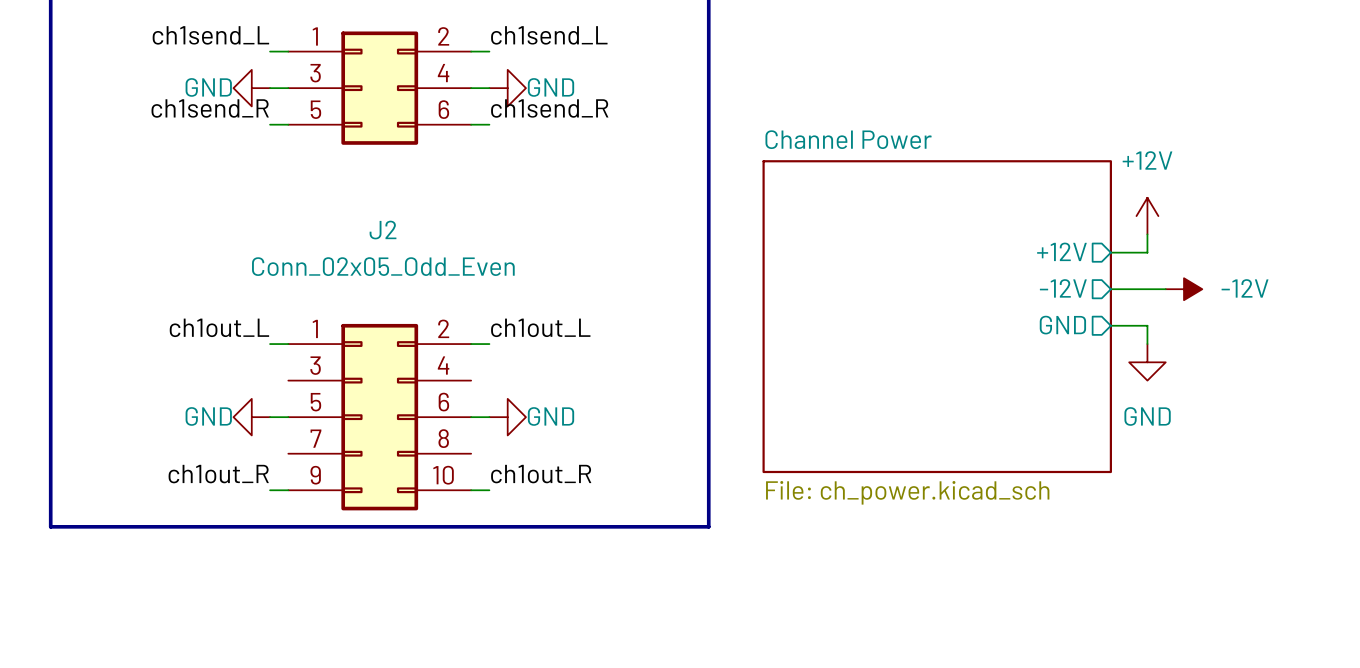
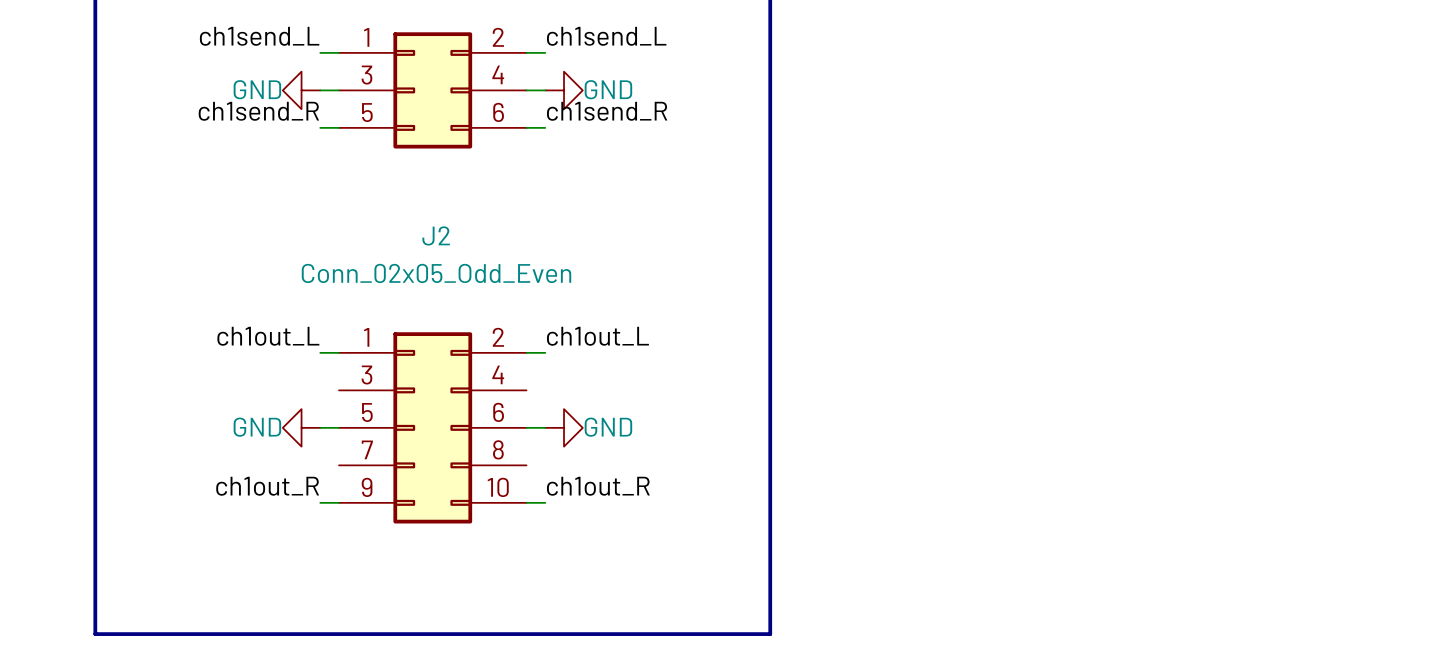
power symbol: +12V (1147, 216) -> none
wire: (1147, 234) (1147, 252) (1110, 252) -> none
sheet pin: +12V (1061, 251) -> none
sheet pin: -12V (1063, 288) -> none
wire: (1110, 289) (1165, 289) -> none
power symbol: -12V (1184, 289) -> none
sheet Channel Power: File: ch_power.kicad_sch (937, 316) -> none
sheet pin: GND (1062, 325) -> none
wire: (1110, 325) (1147, 325) (1147, 344) -> none
power symbol: GND (1147, 362) -> none
line: (50, 526) (708, 526) -> (95, 540) (95, 634) (770, 634) (770, 540)

